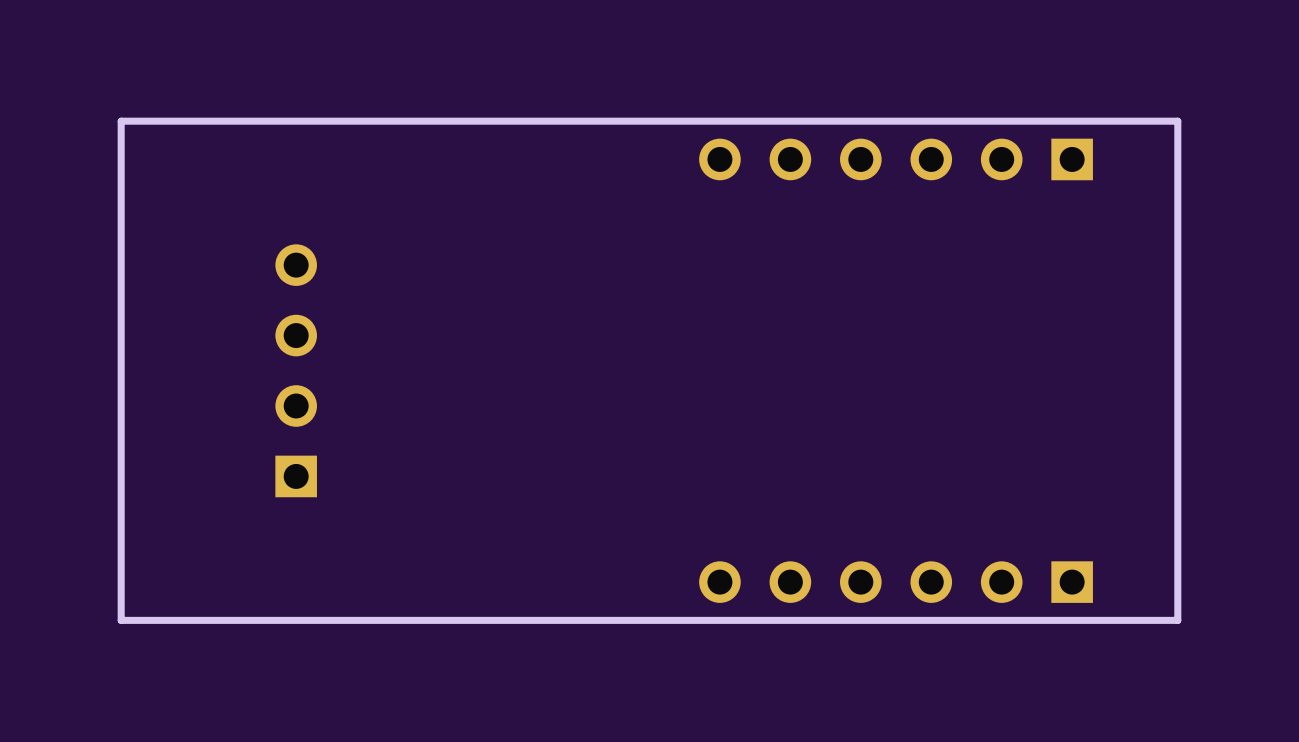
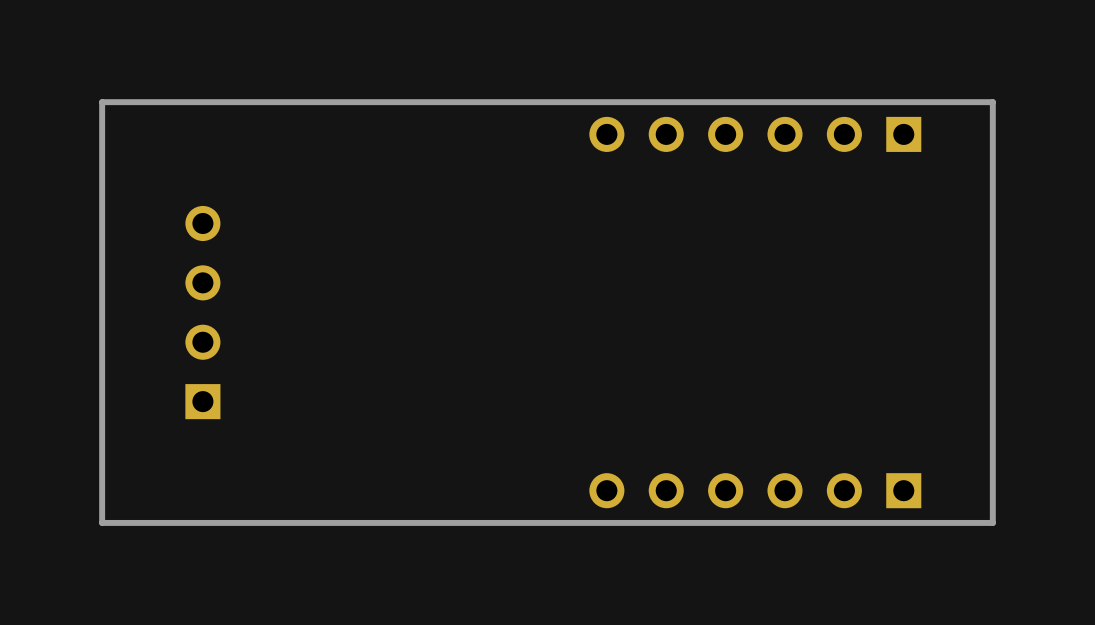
part position: (296, 370) -> (202, 312)

